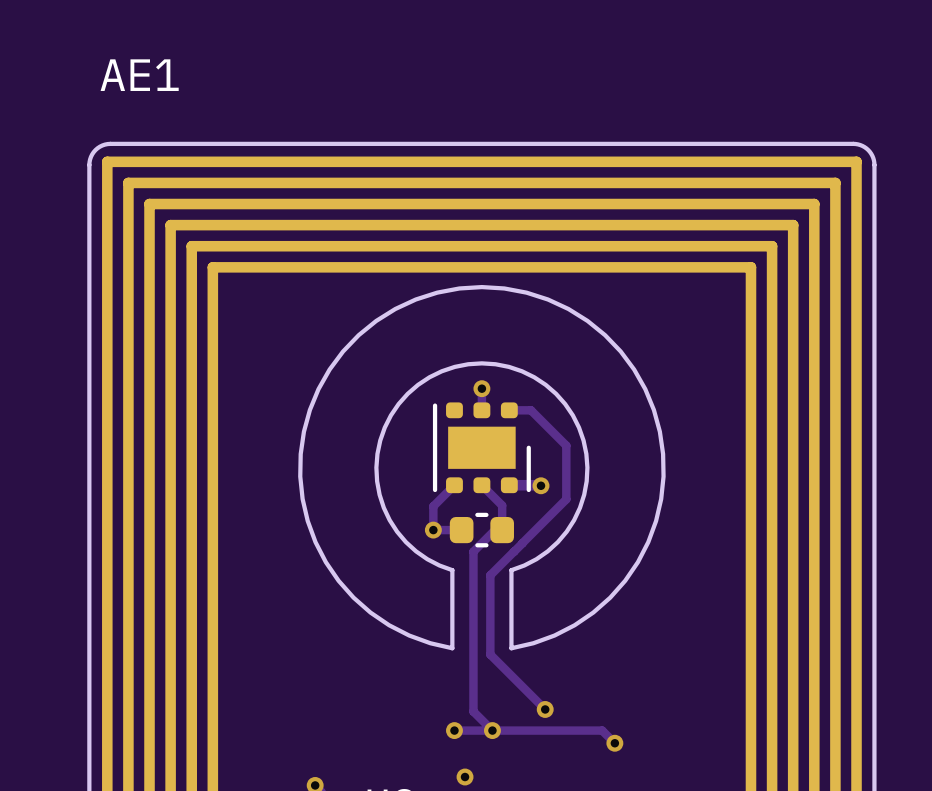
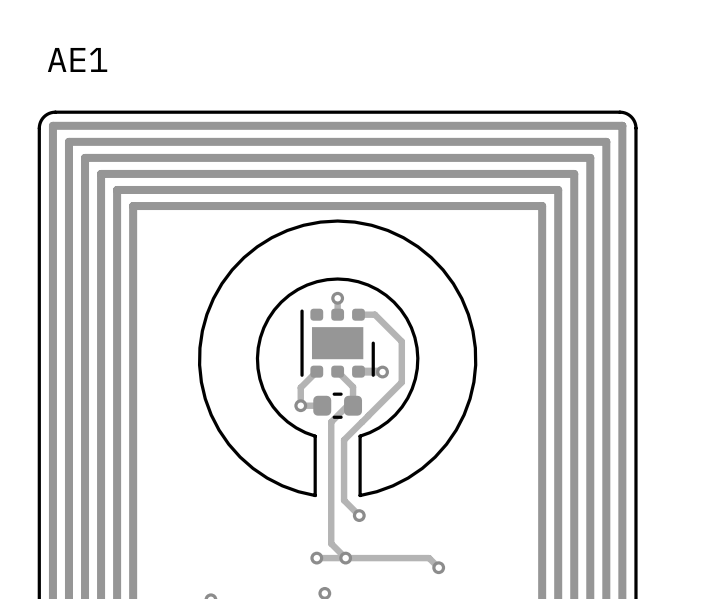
track: (510, 674) (545, 709) -> none
via position: (545, 709) -> (359, 515)

